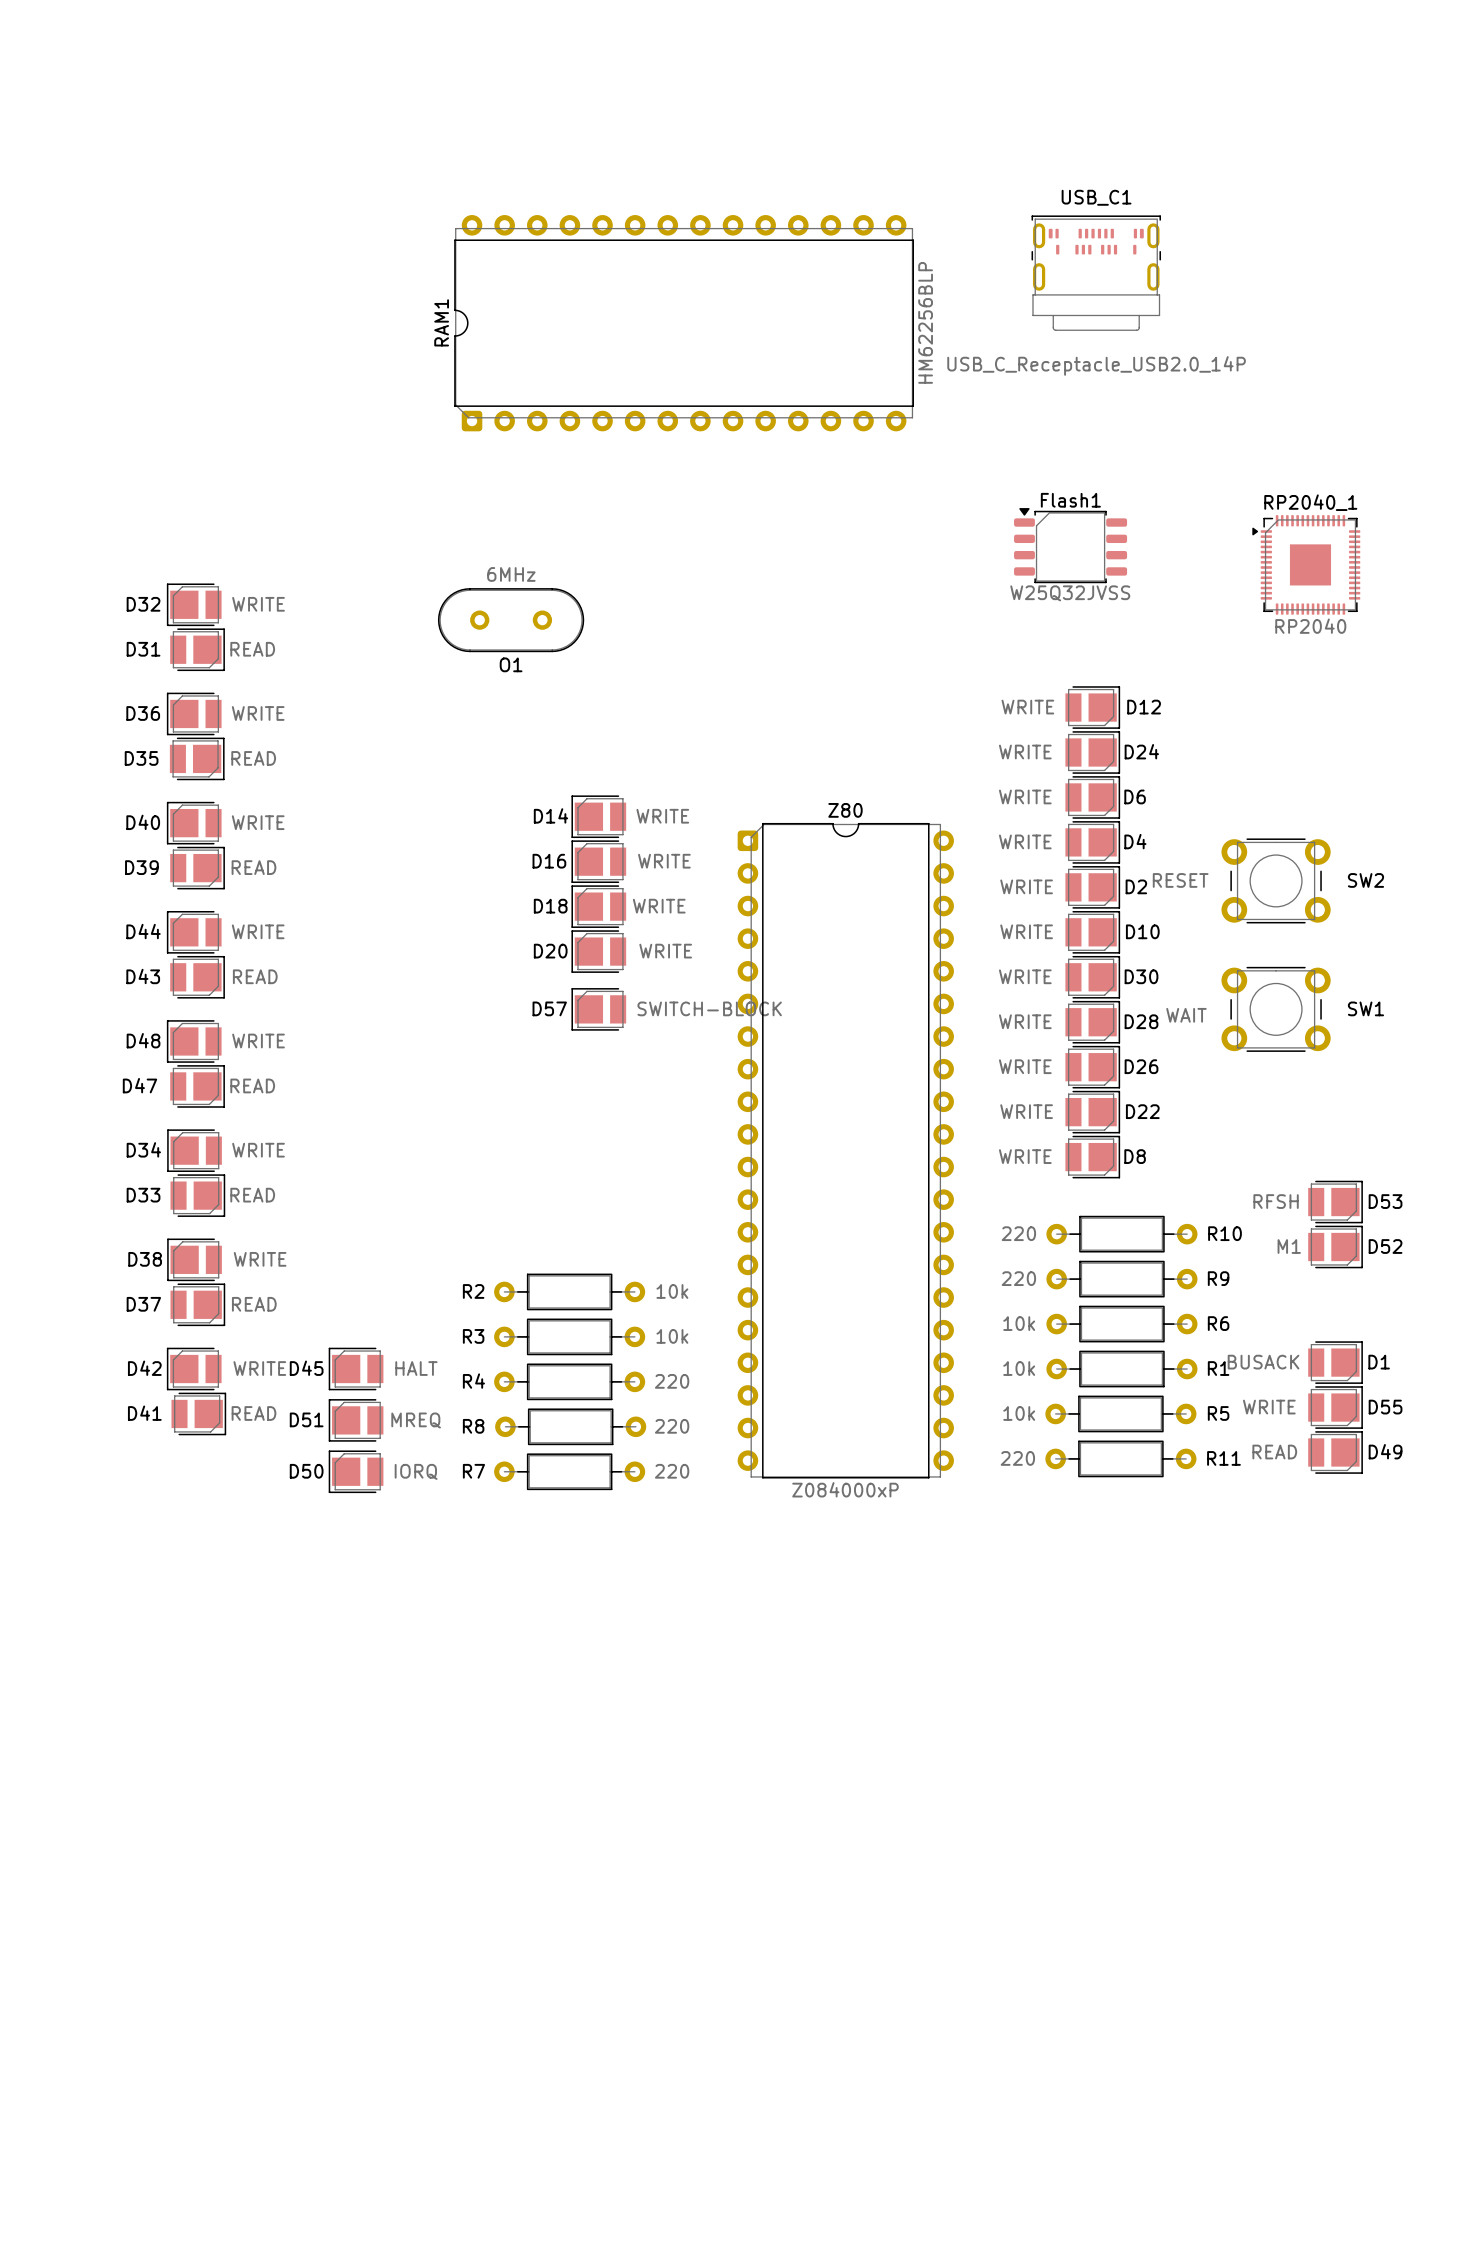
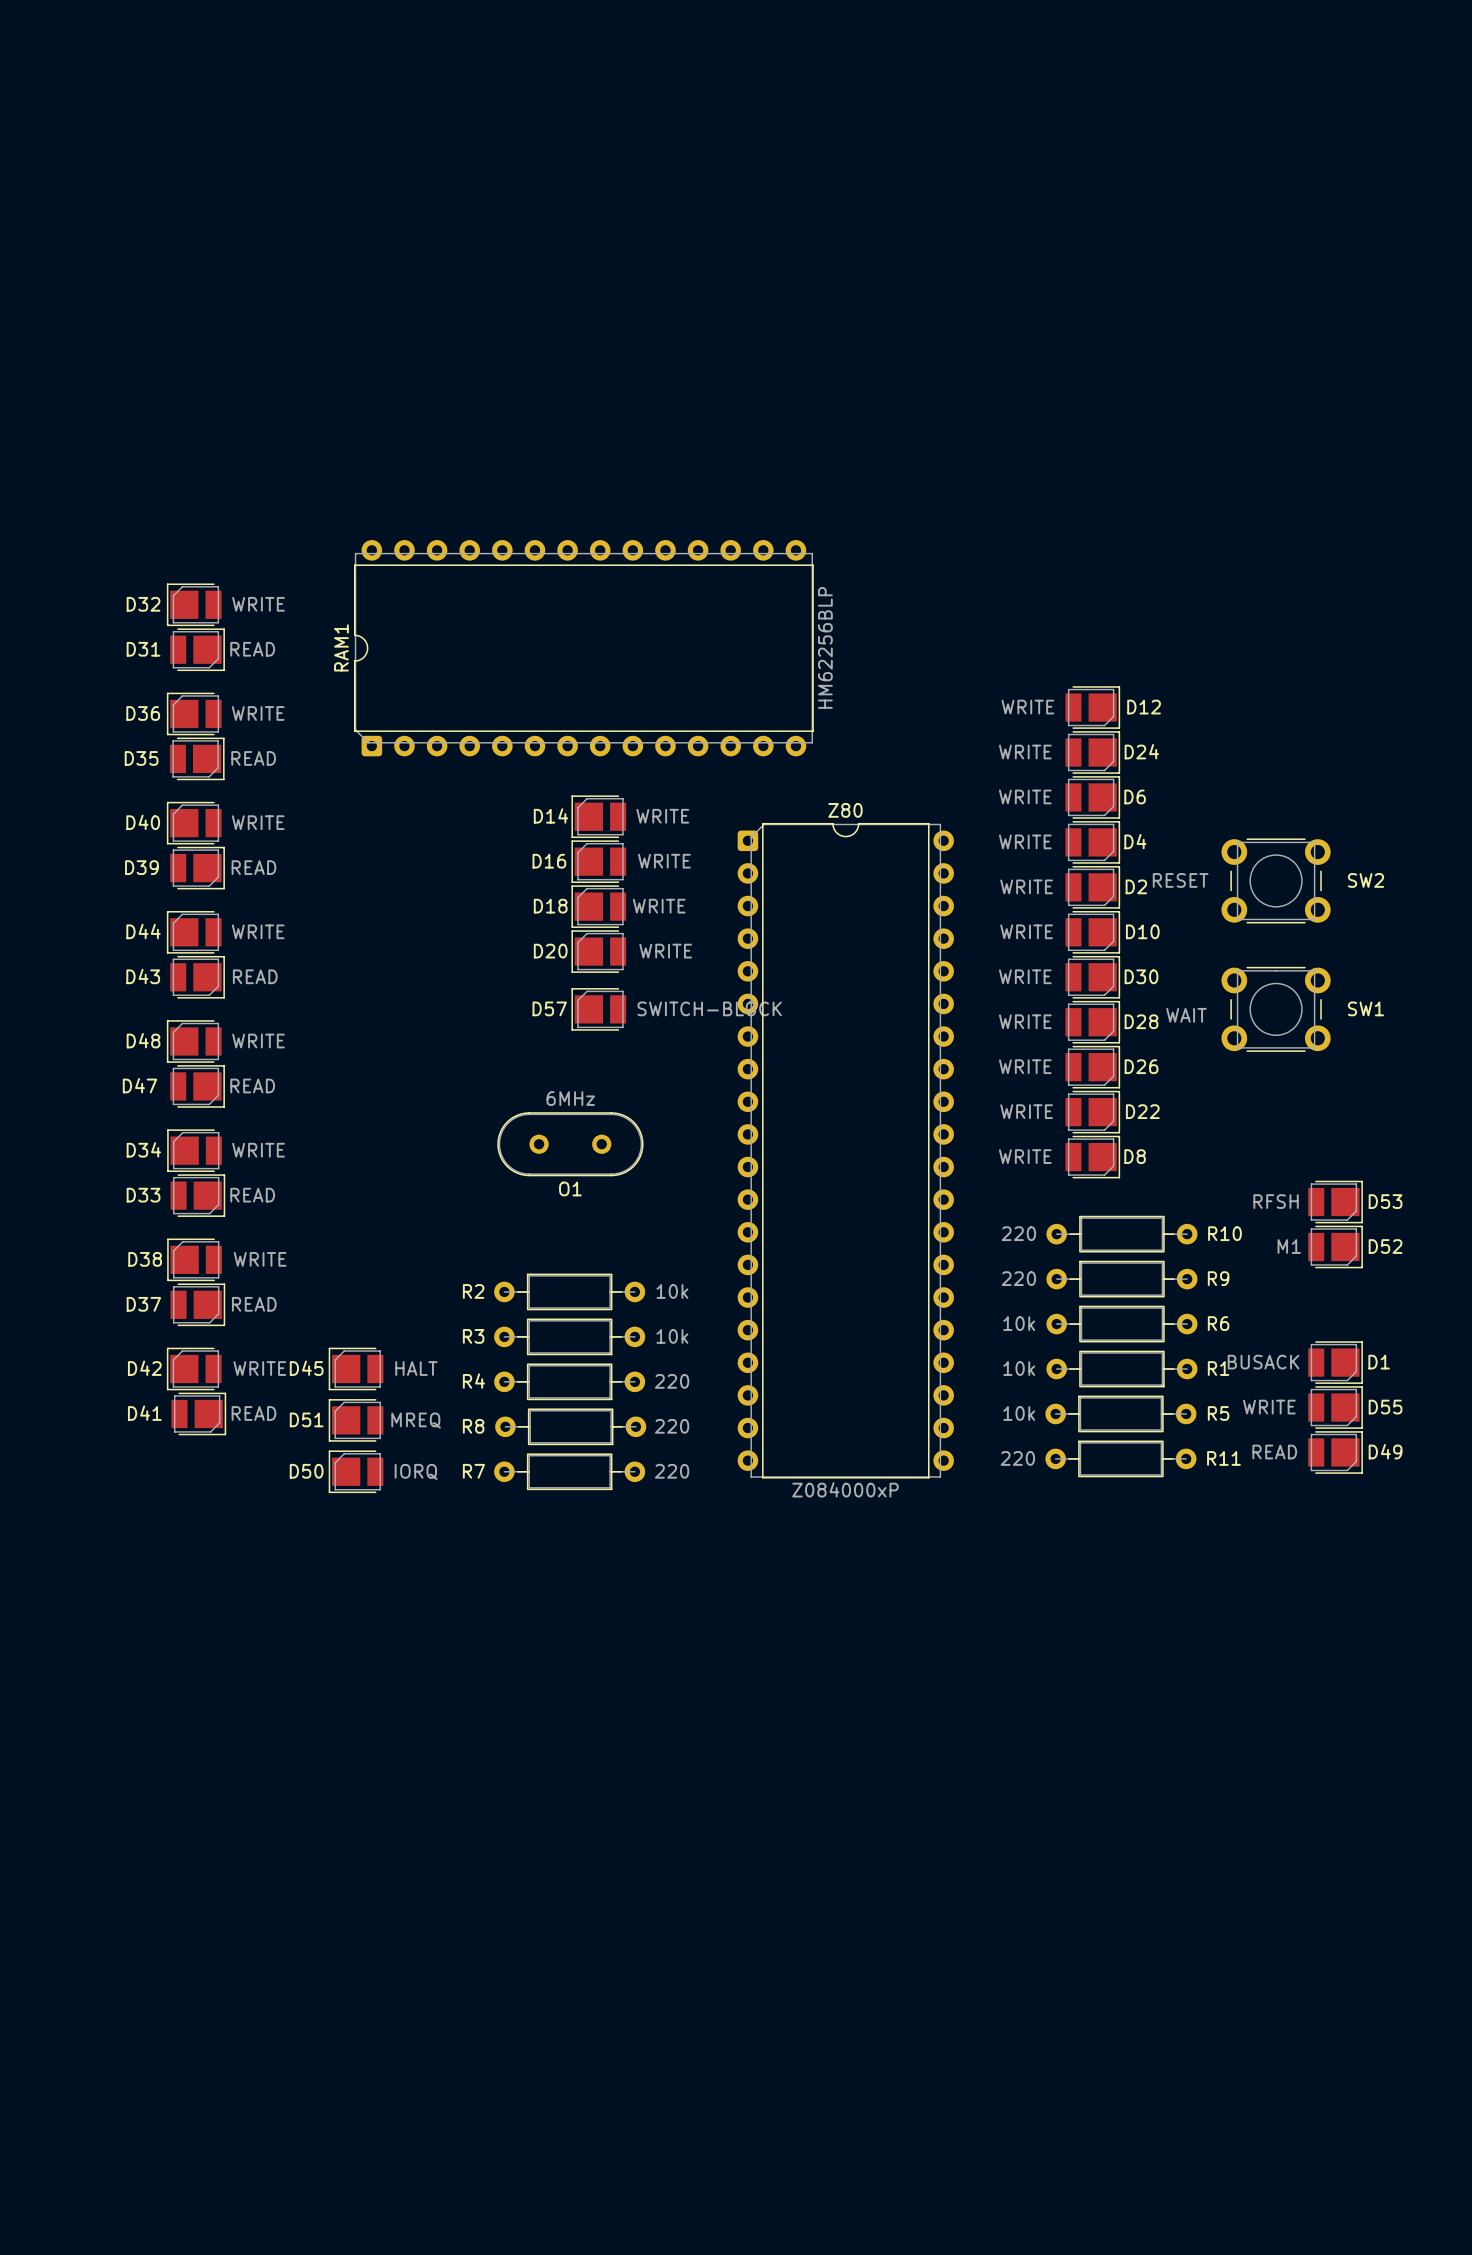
USB_C1: USB_C_Receptacle_USB2.0_14P (1096, 273) -> none
RAM1 position: (684, 323) -> (583, 648)
Flash1: W25Q32JVSS (1070, 545) -> none
RP2040_1: RP2040 (1306, 564) -> none
O1 position: (511, 620) -> (570, 1144)

